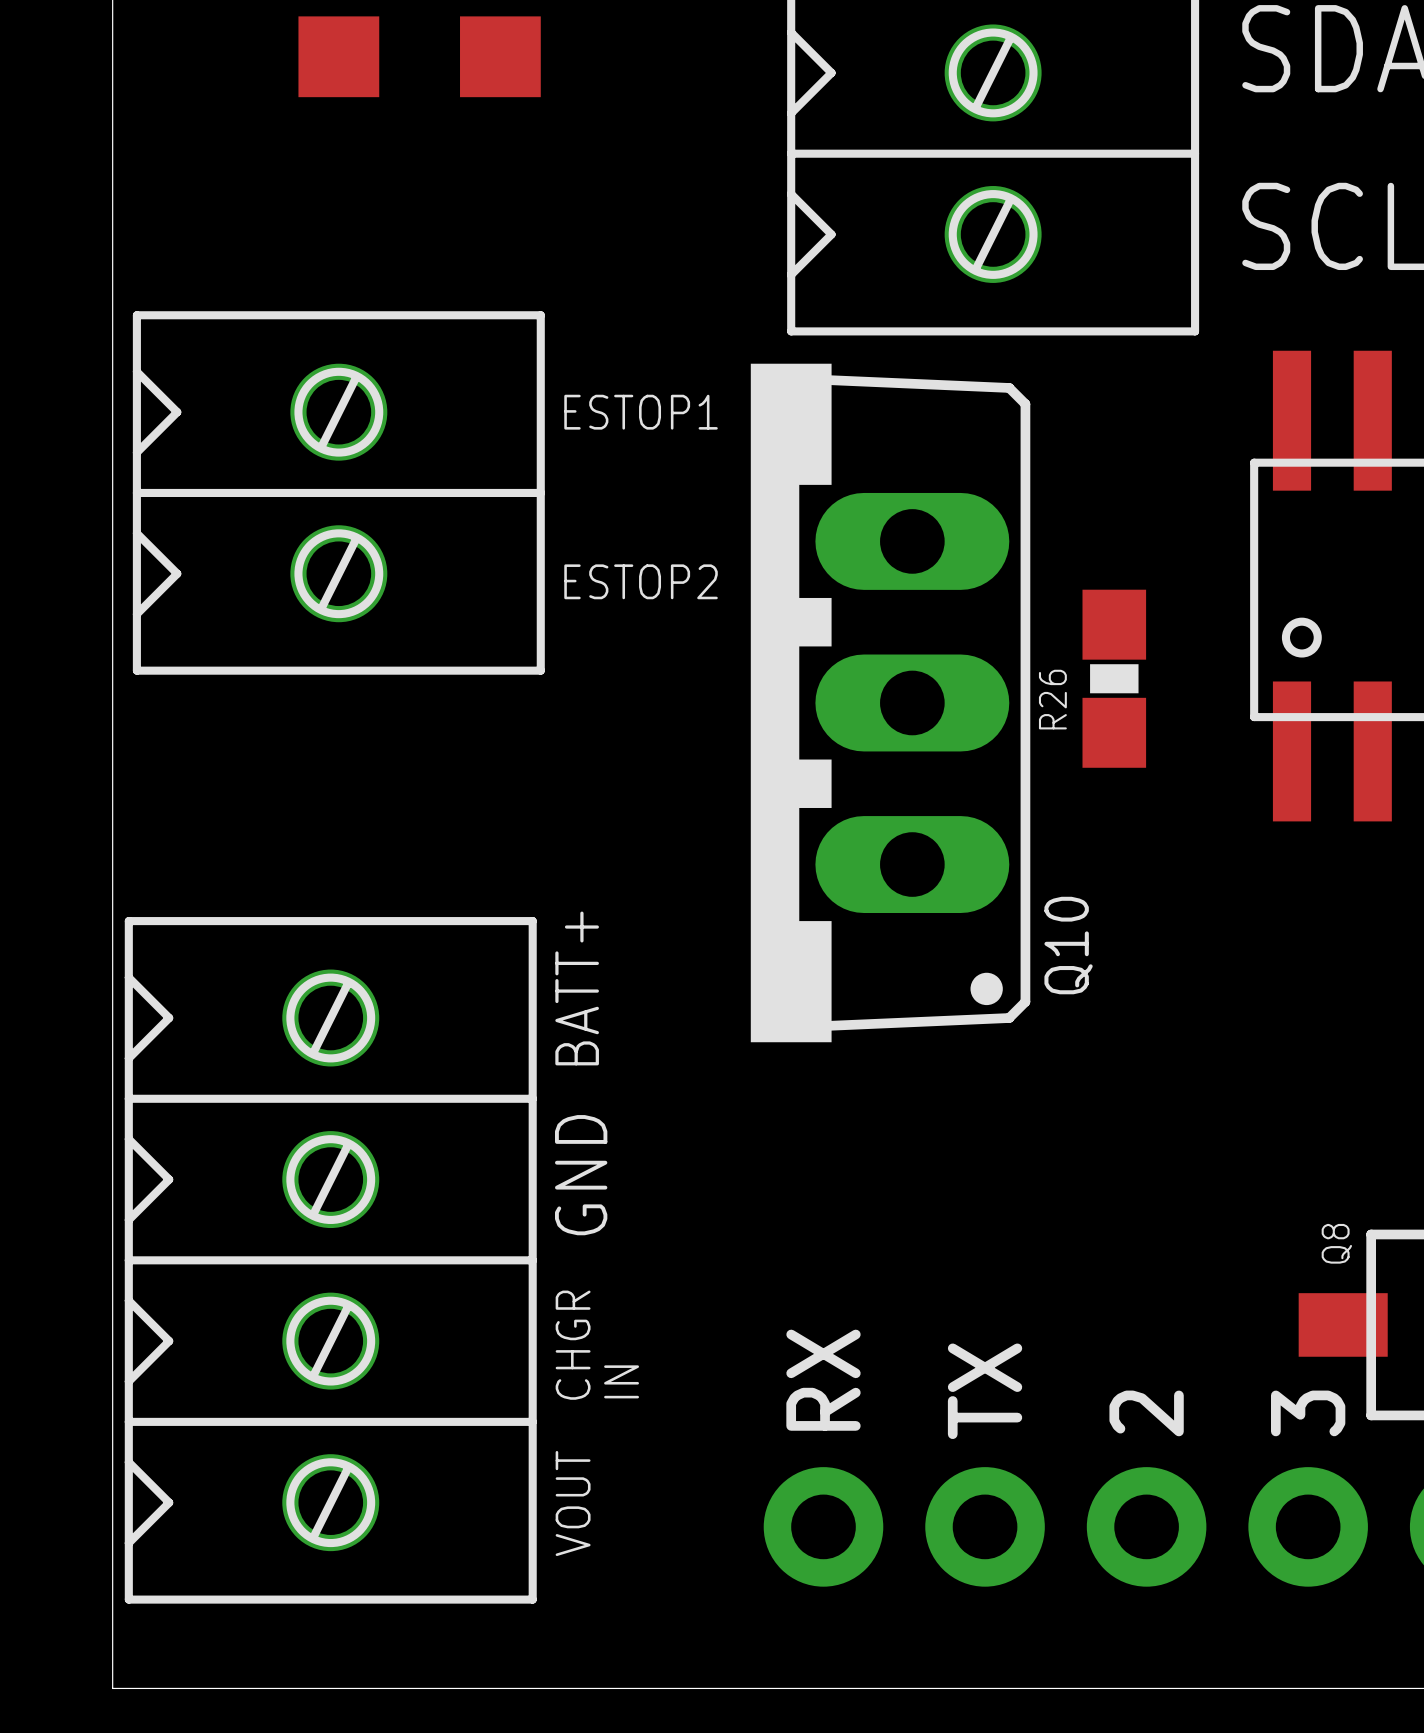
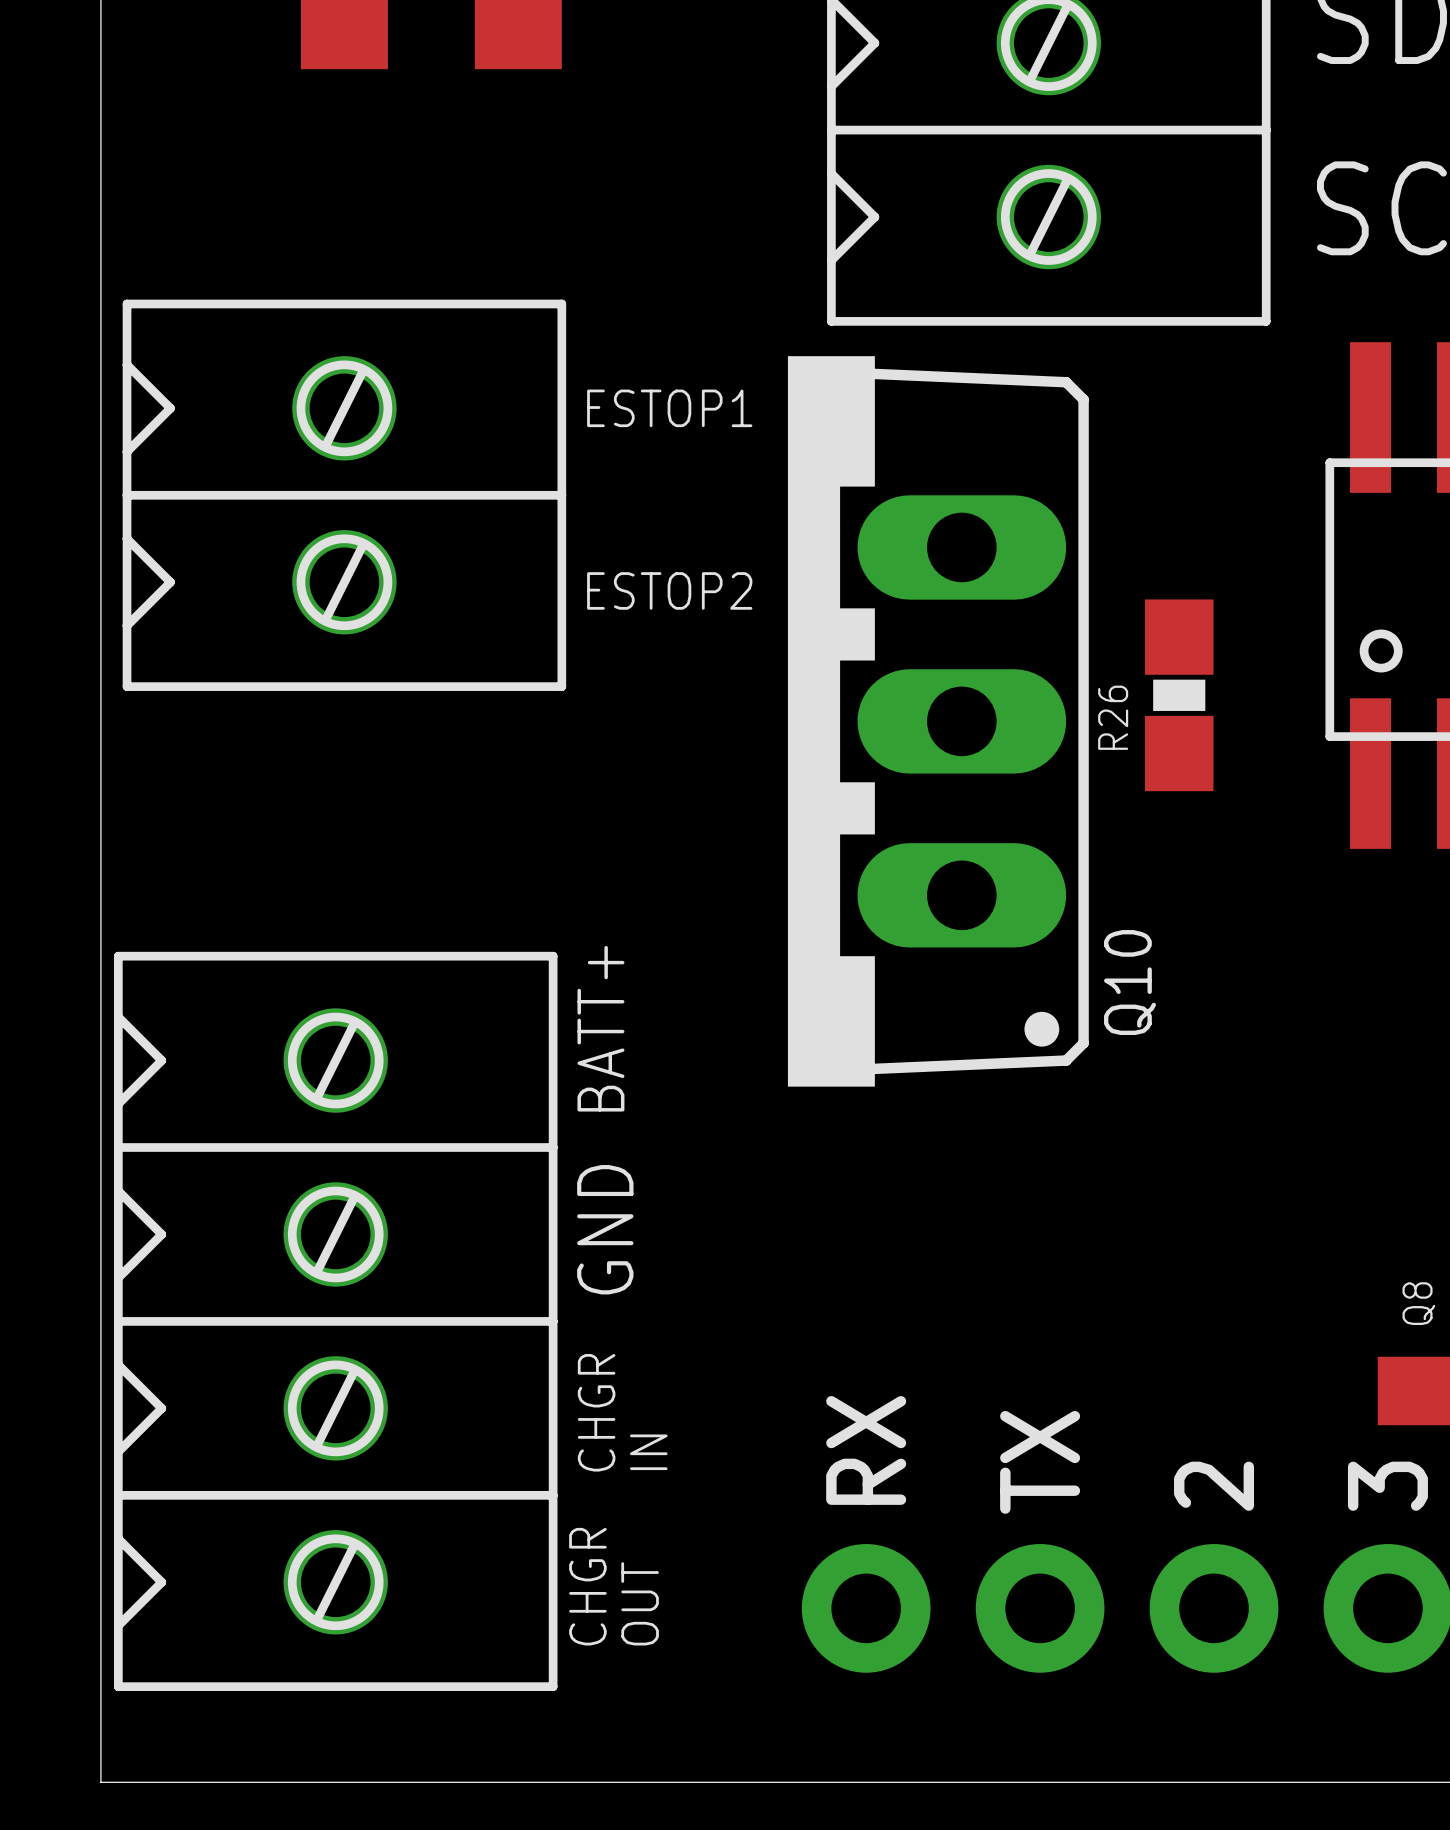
text: VOUT (573, 1503) -> CHGR (587, 1586)
text: none -> OUT (640, 1603)

